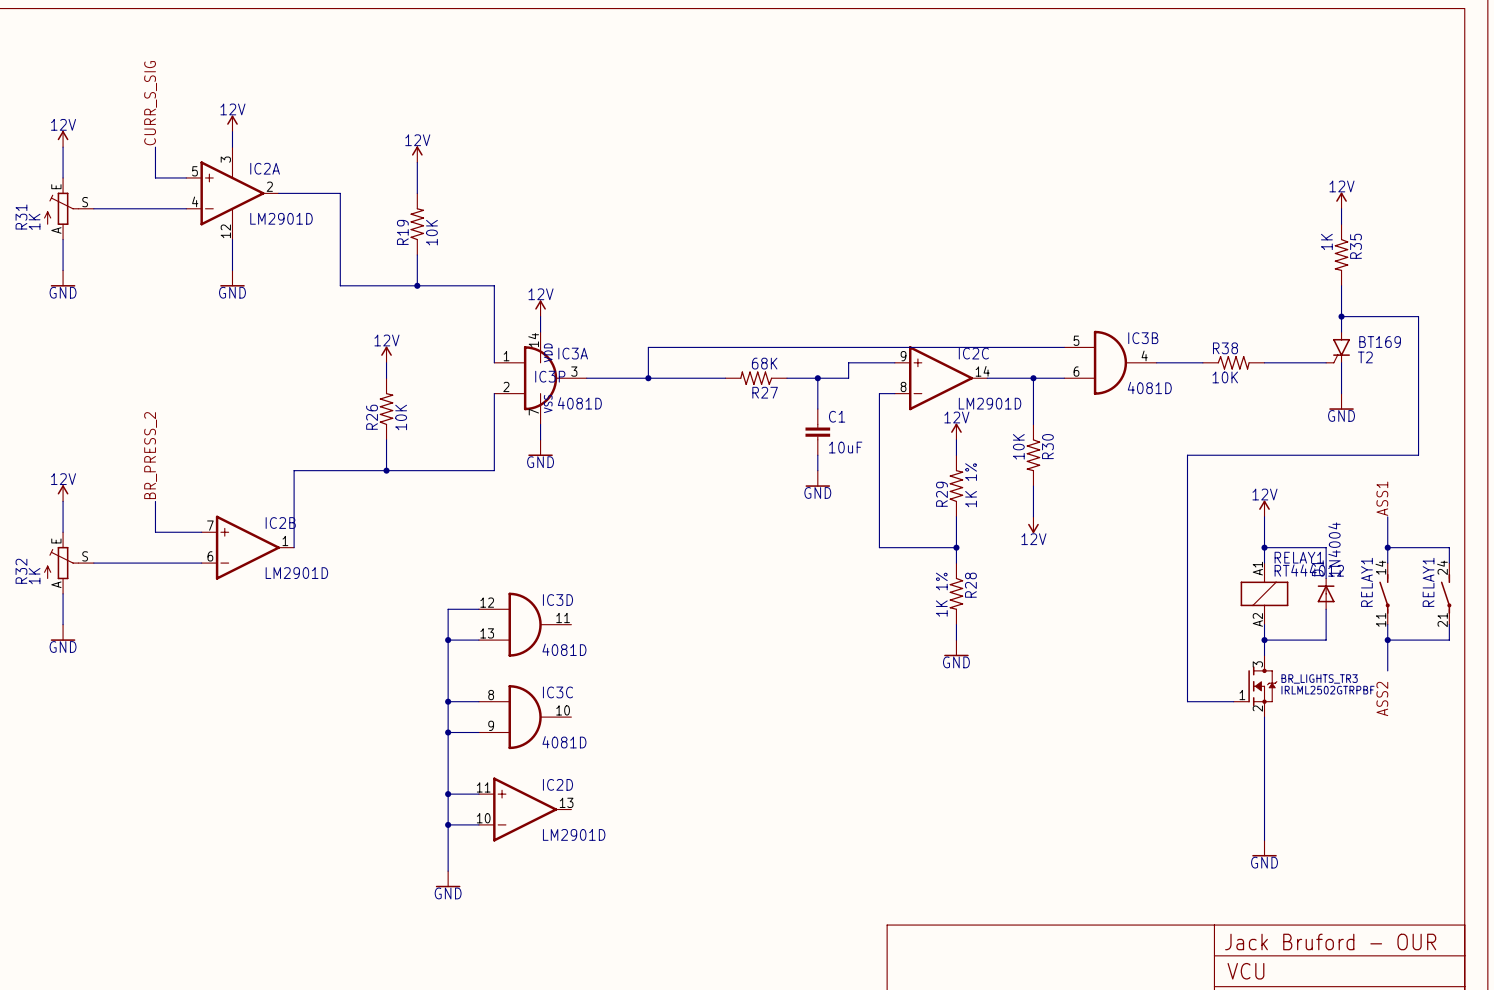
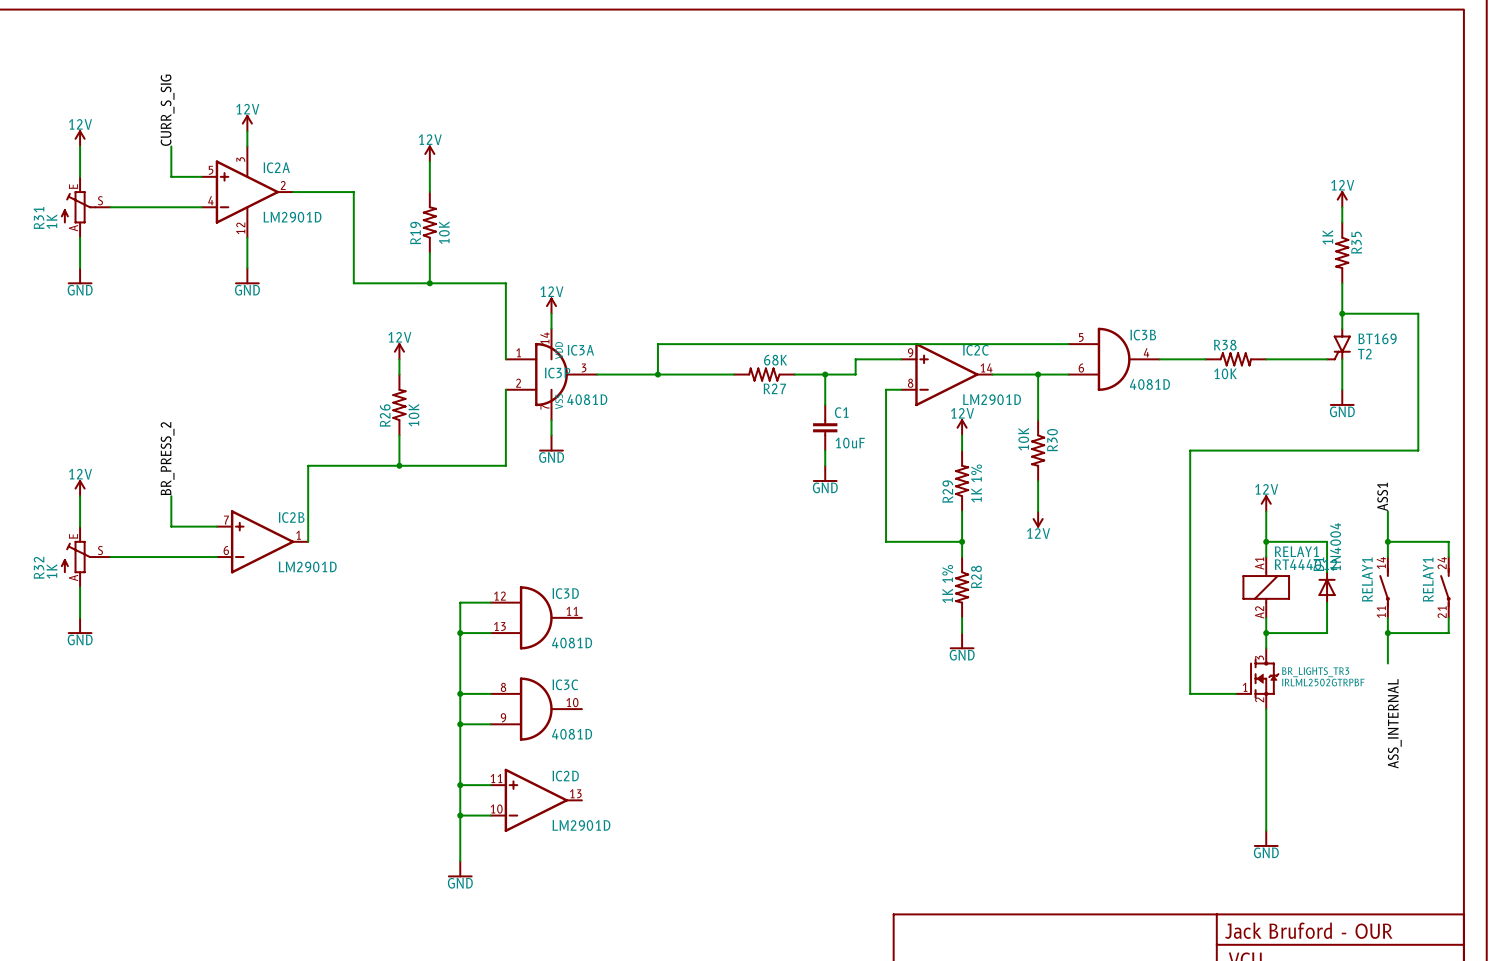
label: ASS2 (1382, 698) -> none
label: none -> ASS_INTERNAL (1394, 723)

